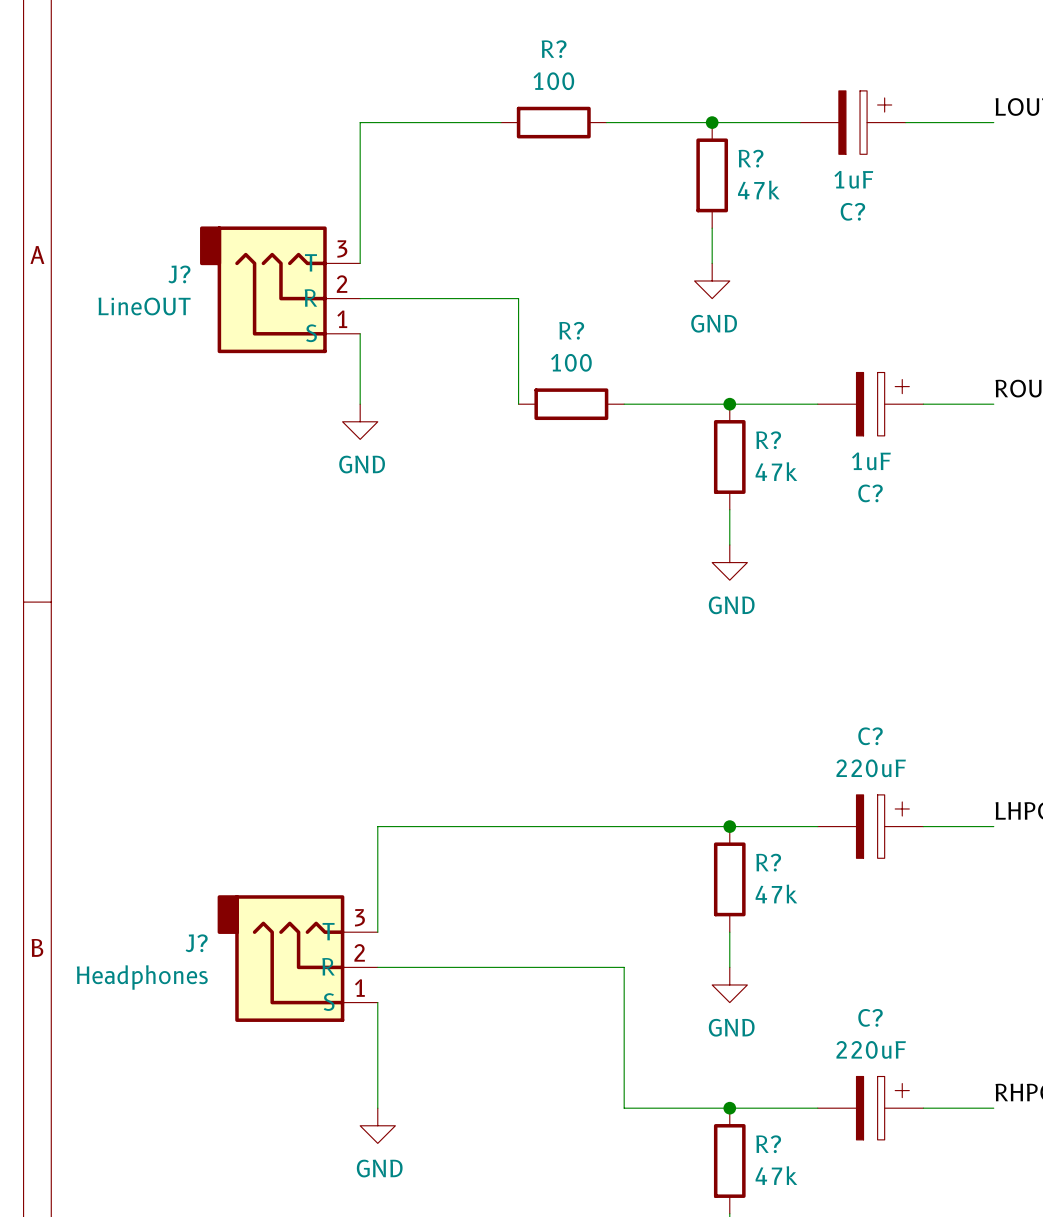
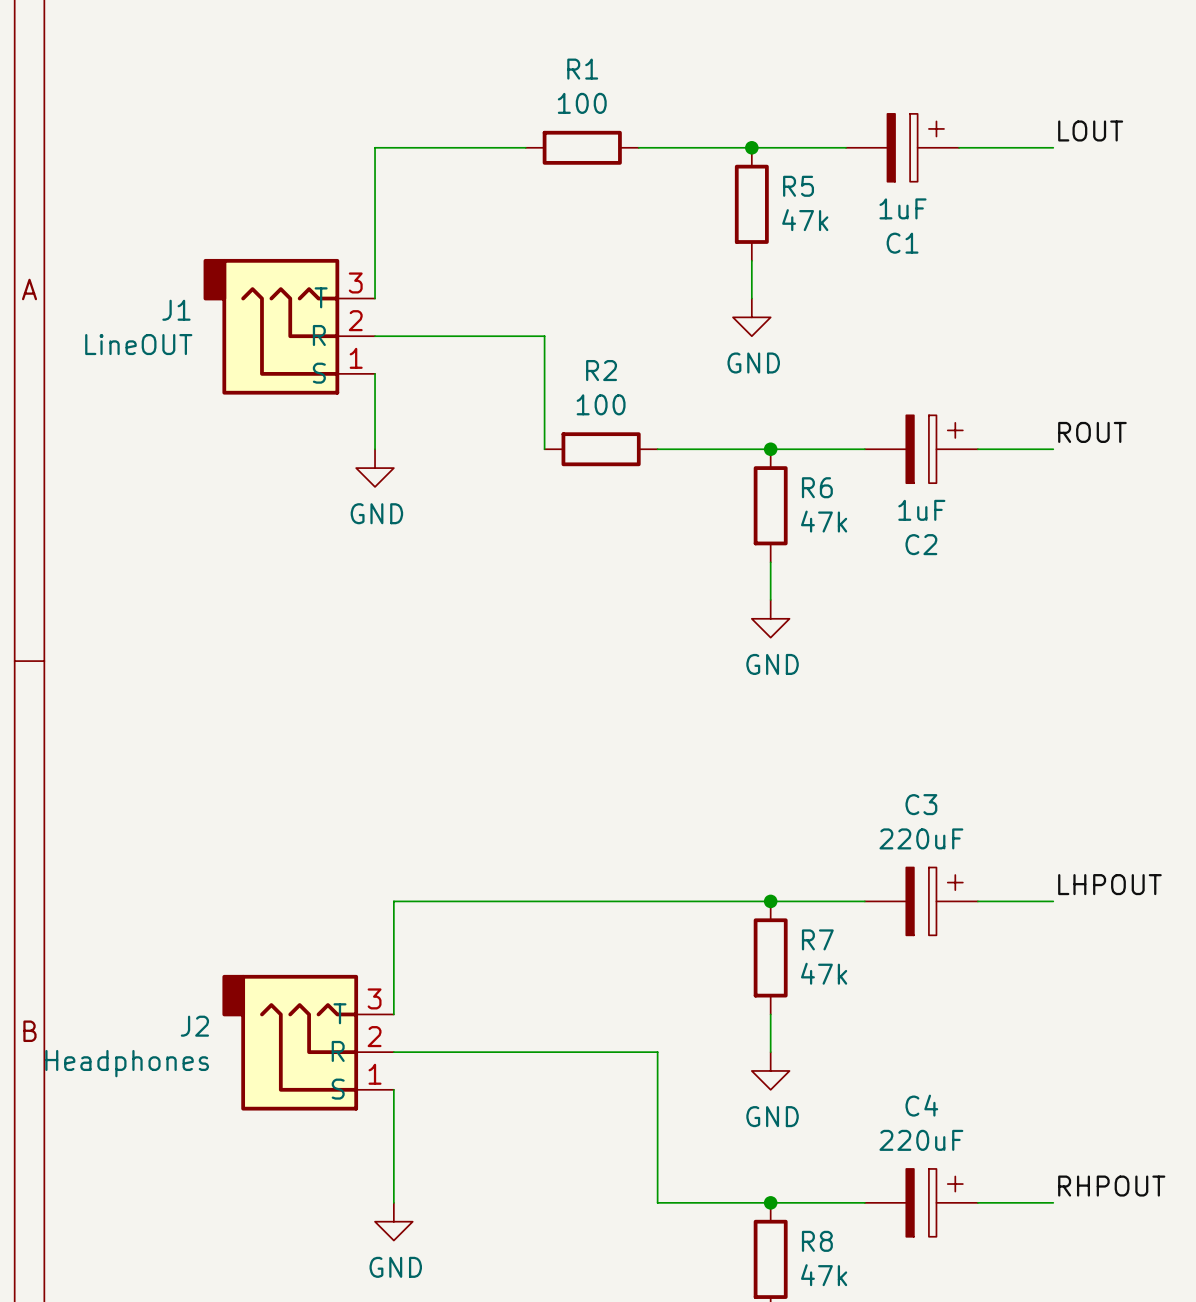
R? name: R? (554, 49) -> R1 (582, 69)
R? name: R? (751, 158) -> R5 (798, 186)
C? name: C? (852, 211) -> C1 (902, 243)
J? name: J? (179, 274) -> J1 (176, 310)
R? name: R? (571, 330) -> R2 (601, 370)
R? name: R? (768, 440) -> R6 (817, 487)
C? name: C? (870, 493) -> C2 (921, 544)
C? name: C? (870, 736) -> C3 (921, 804)
R? name: R? (768, 862) -> R7 (817, 939)
J? name: J? (196, 943) -> J2 (194, 1026)
C? name: C? (870, 1017) -> C4 (921, 1105)
R? name: R? (768, 1144) -> R8 (817, 1241)

